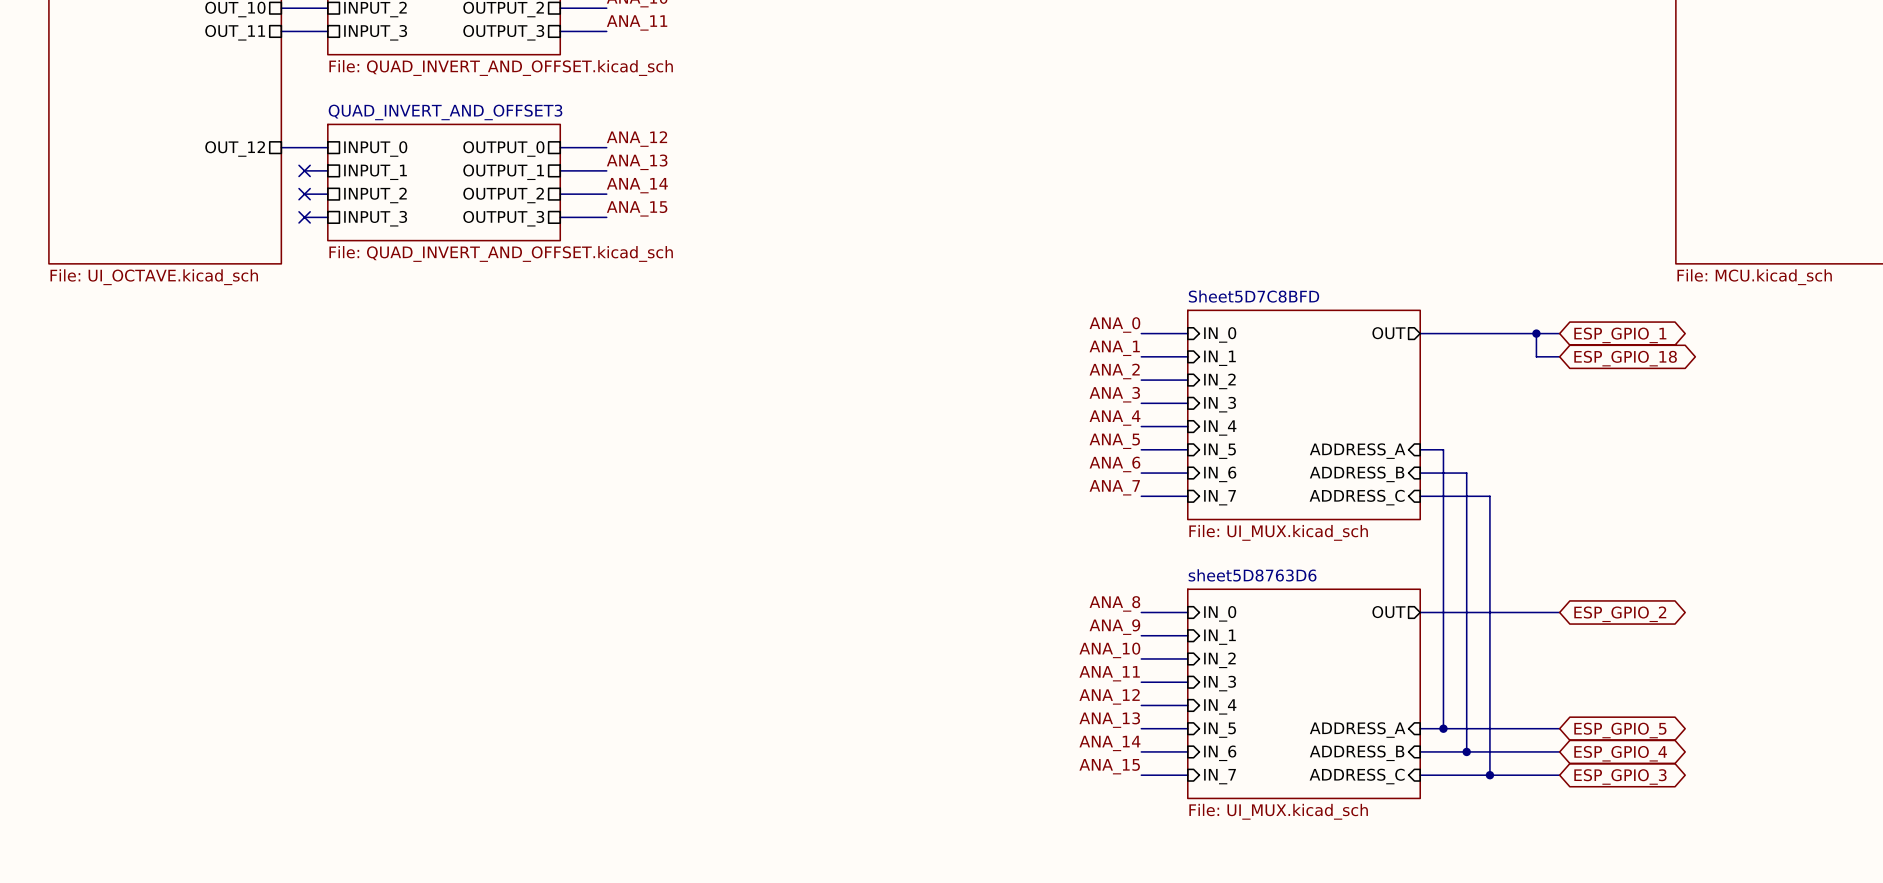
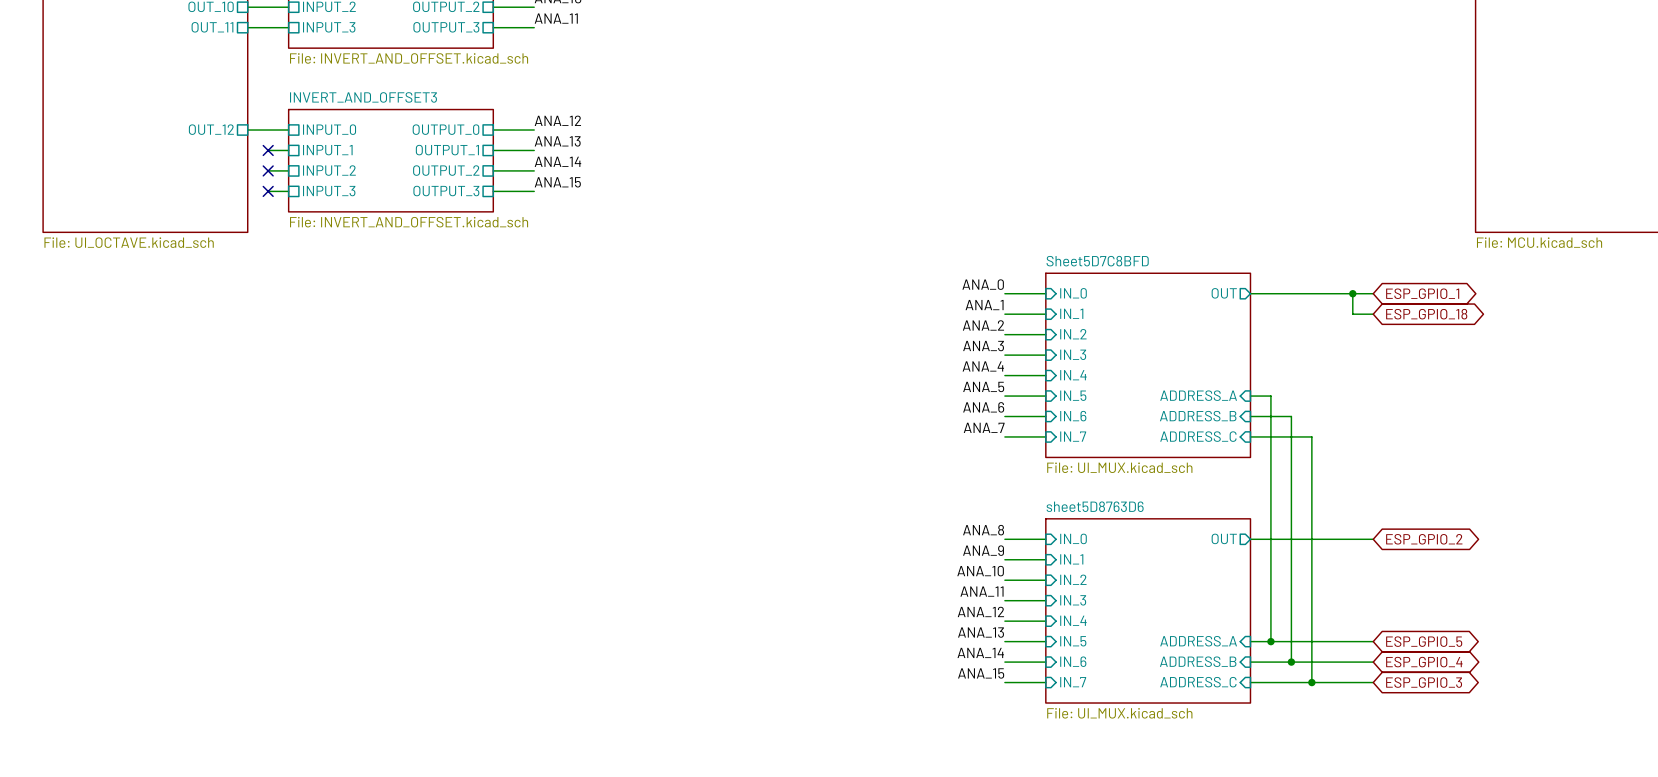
sheet value: File: QUAD_INVERT_AND_OFFSET.kicad_sch (501, 68) -> File: INVERT_AND_OFFSET.kicad_sch (409, 58)
sheet QUAD_INVERT_AND_OFFSET3 name: QUAD_INVERT_AND_OFFSET3 (445, 112) -> INVERT_AND_OFFSET3 (363, 97)
sheet QUAD_INVERT_AND_OFFSET3 value: File: QUAD_INVERT_AND_OFFSET.kicad_sch (501, 253) -> File: INVERT_AND_OFFSET.kicad_sch (409, 222)

